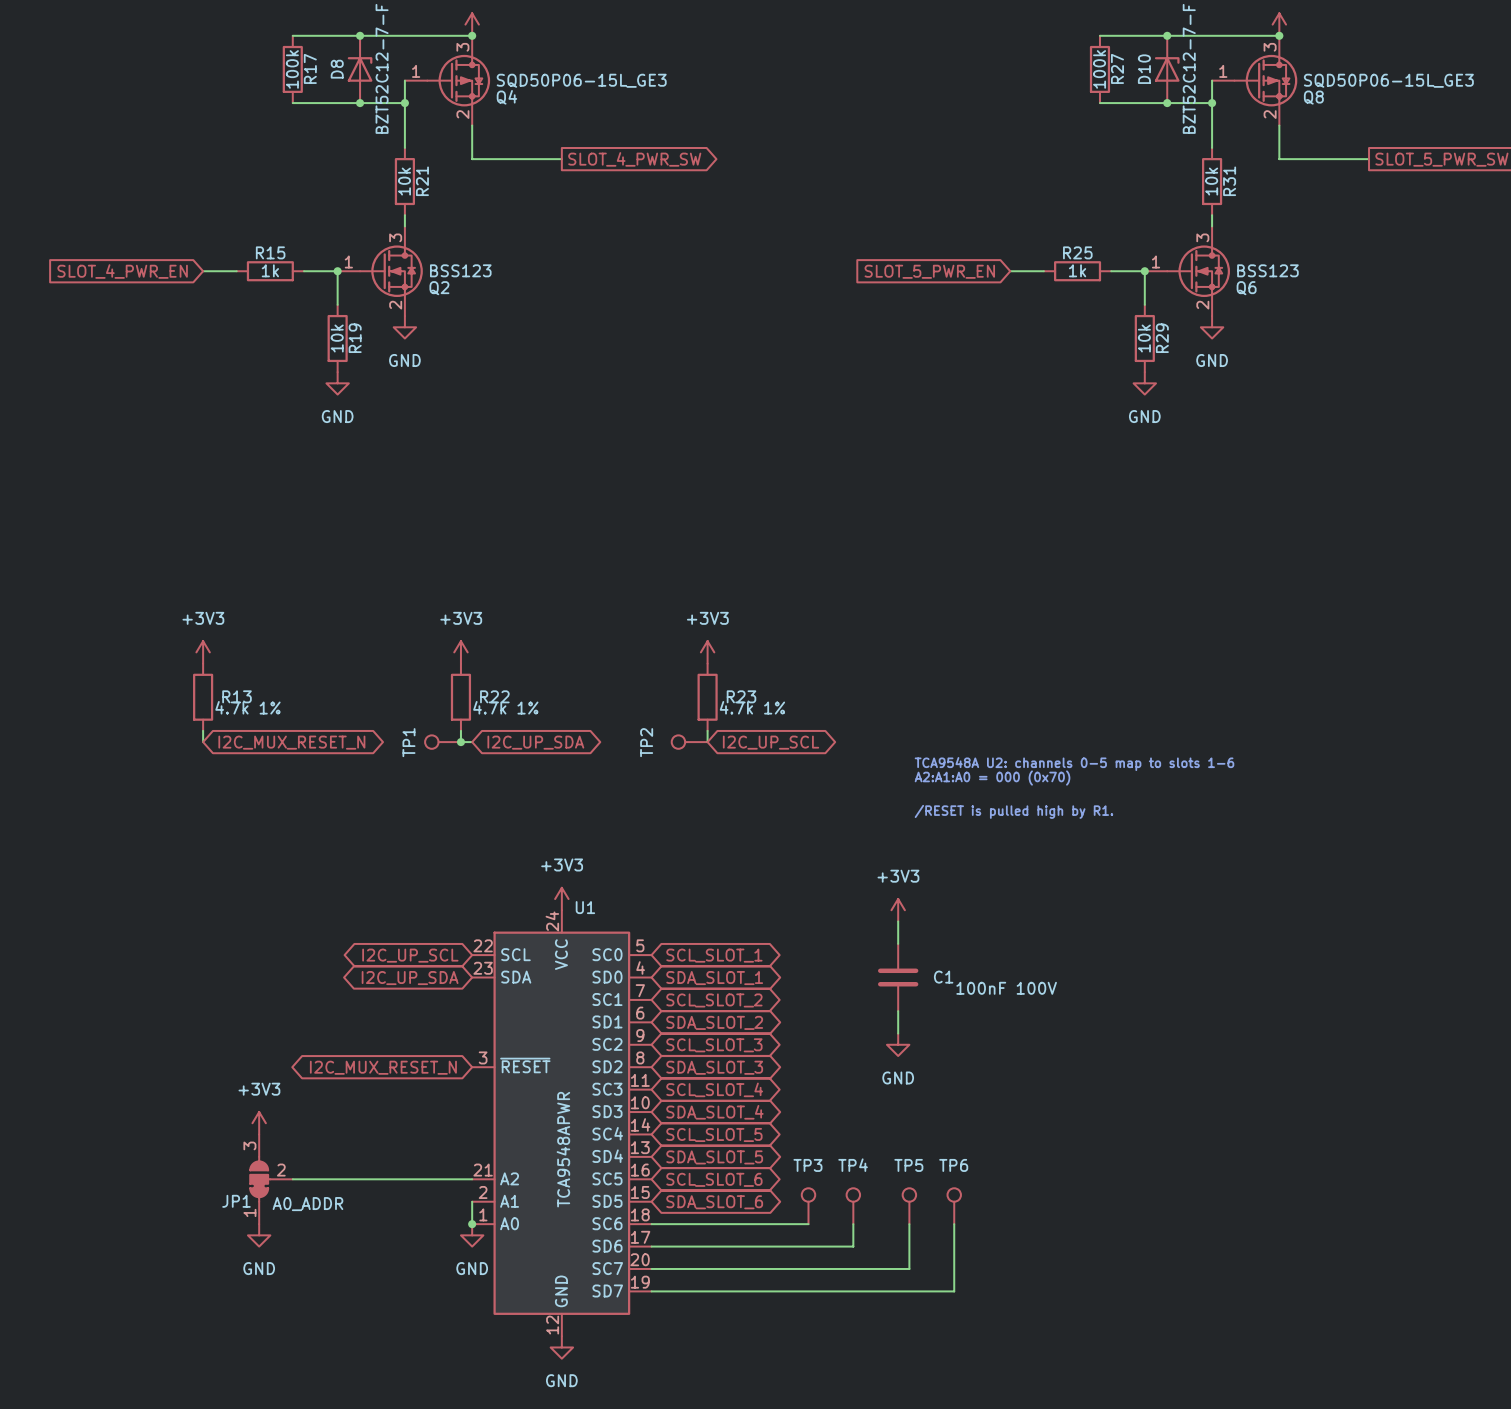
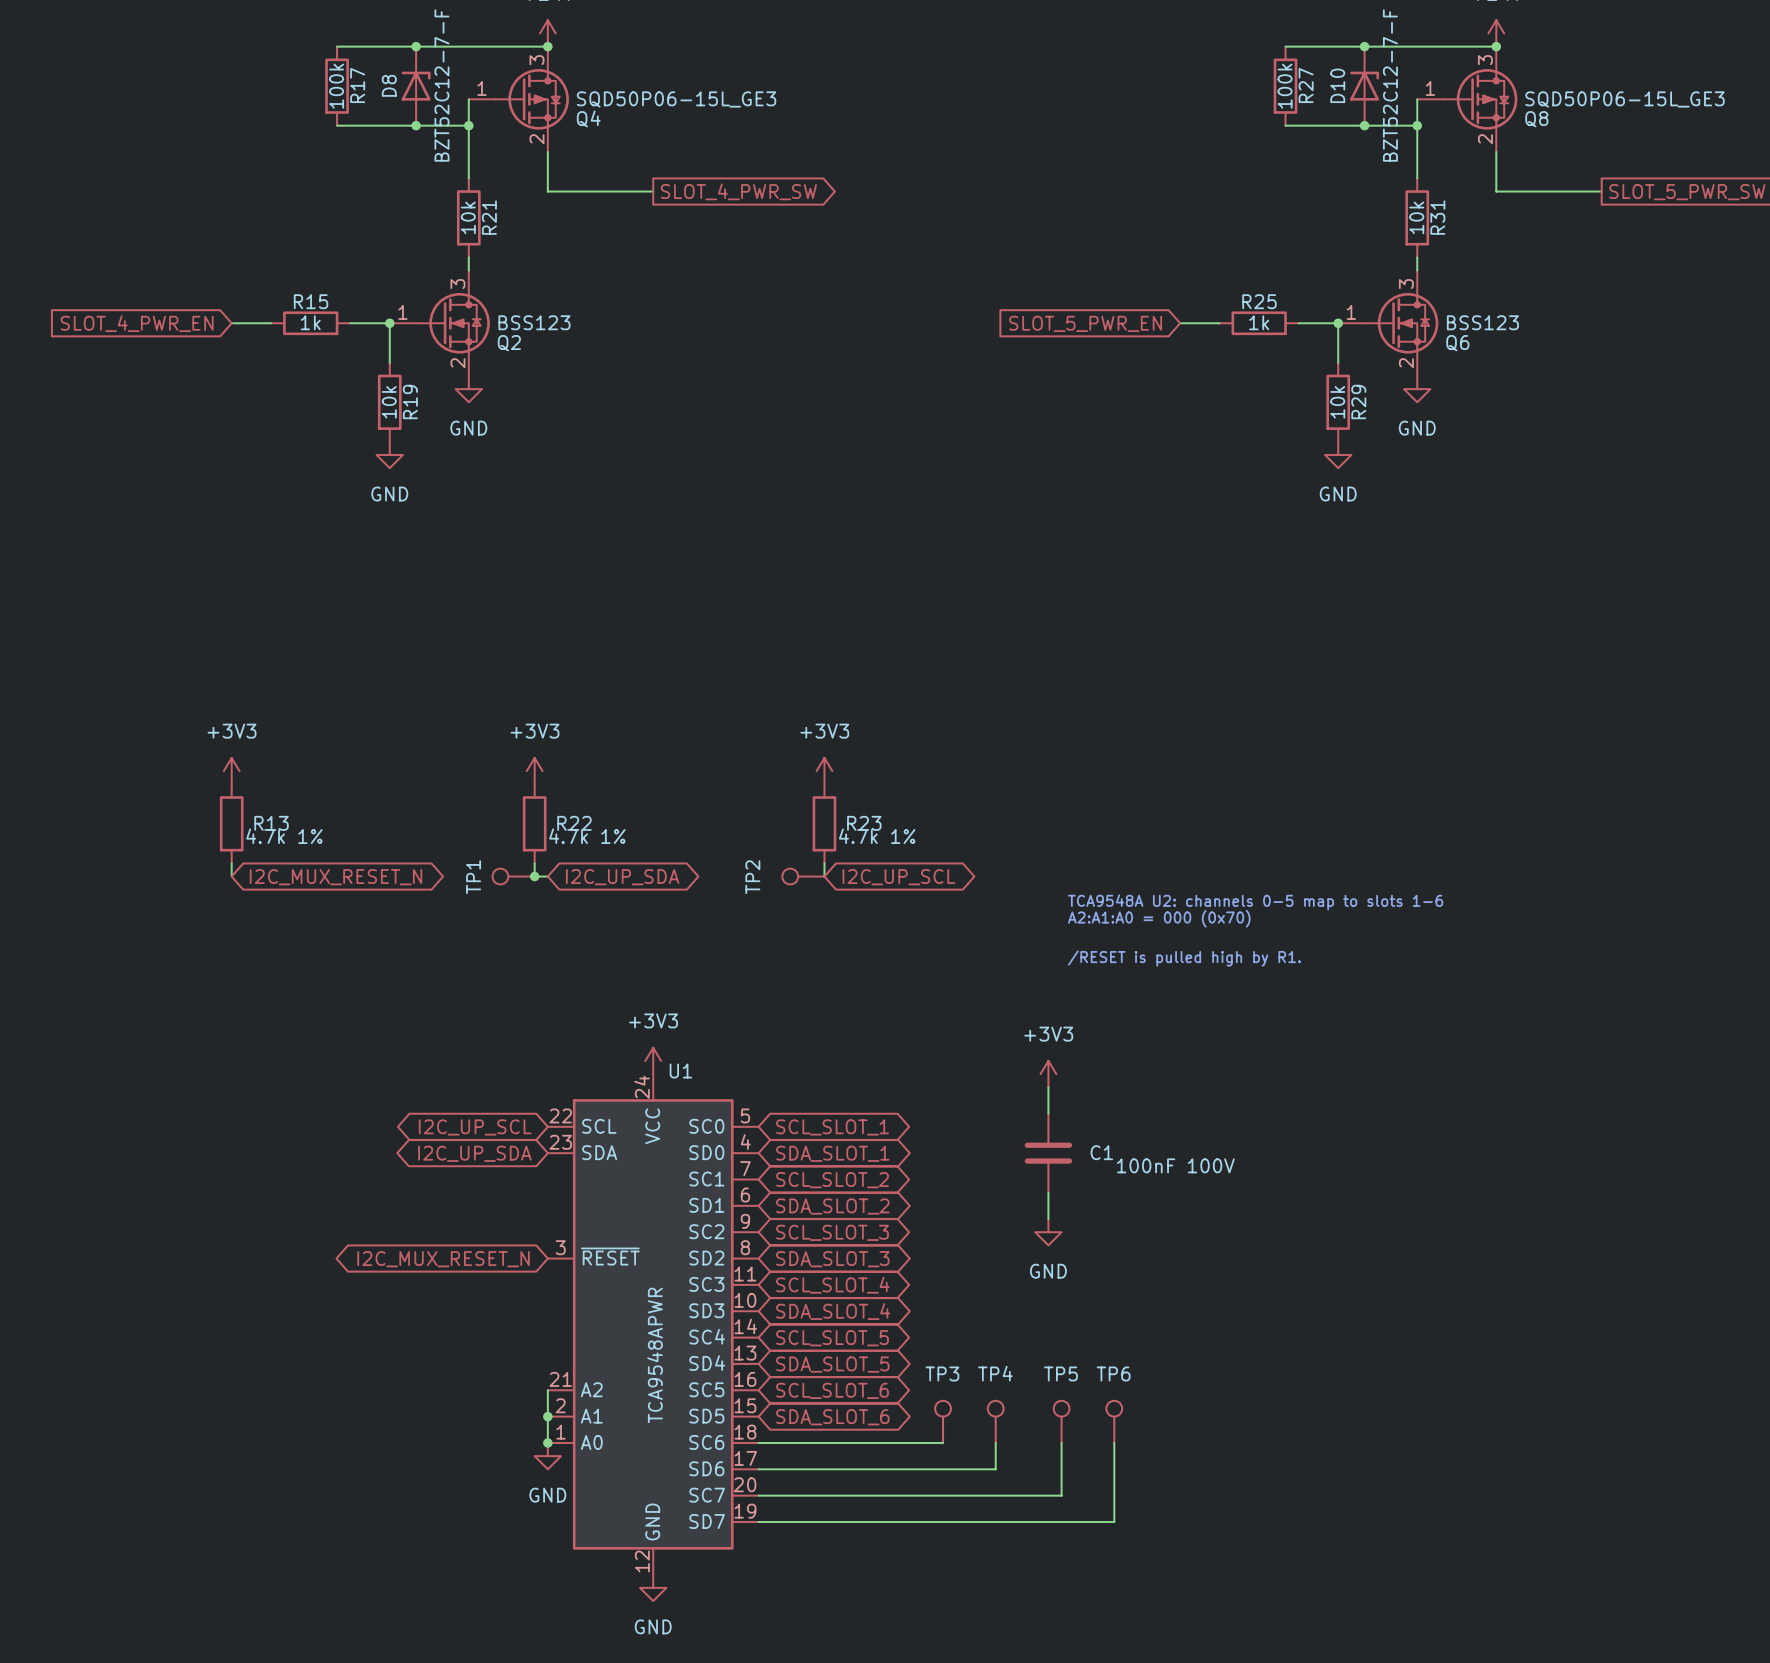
power symbol: +3V3 (259, 1123) -> none
JP1: A0_ADDR (271, 1179) -> none
wire: (292, 1179) (472, 1179) -> (547, 1416) (547, 1390)
junction: none -> (547, 1416)
power symbol: GND (259, 1235) -> none

